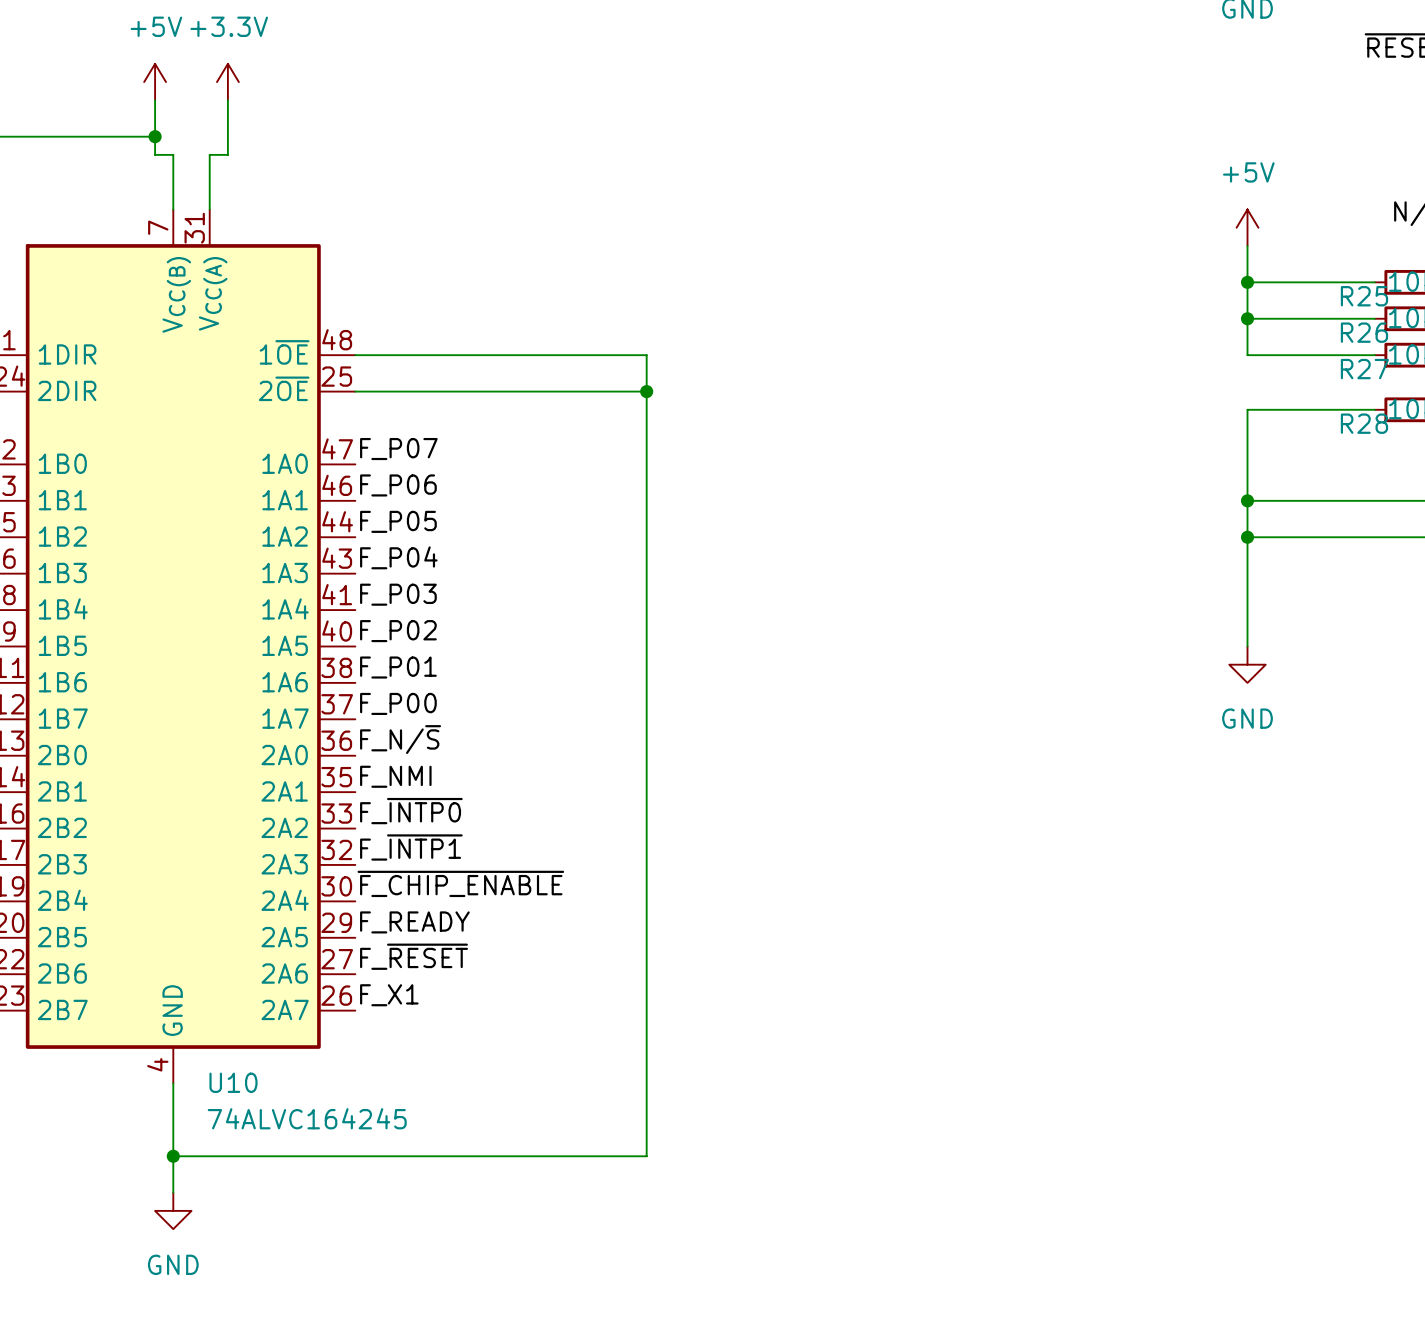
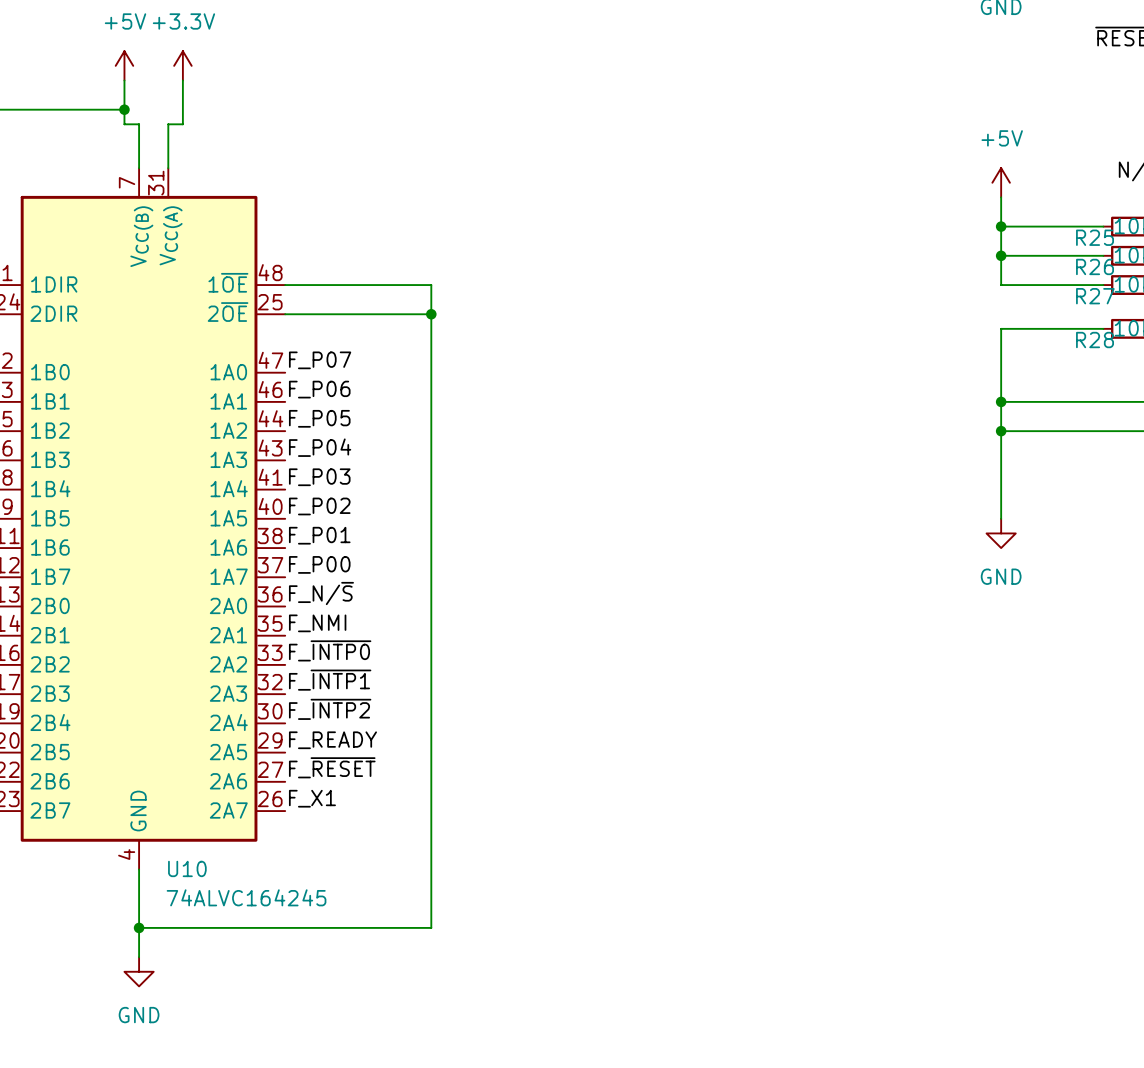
wire: (537, 355) (646, 355) (646, 1156) (537, 1156) -> (431, 285) (431, 927)
wire: (537, 391) (646, 391) -> none
junction: none -> (431, 314)
junction: (646, 391) -> none
label: ~{F_CHIP_ENABLE} (460, 883) -> F_~{INTP2} (330, 709)

